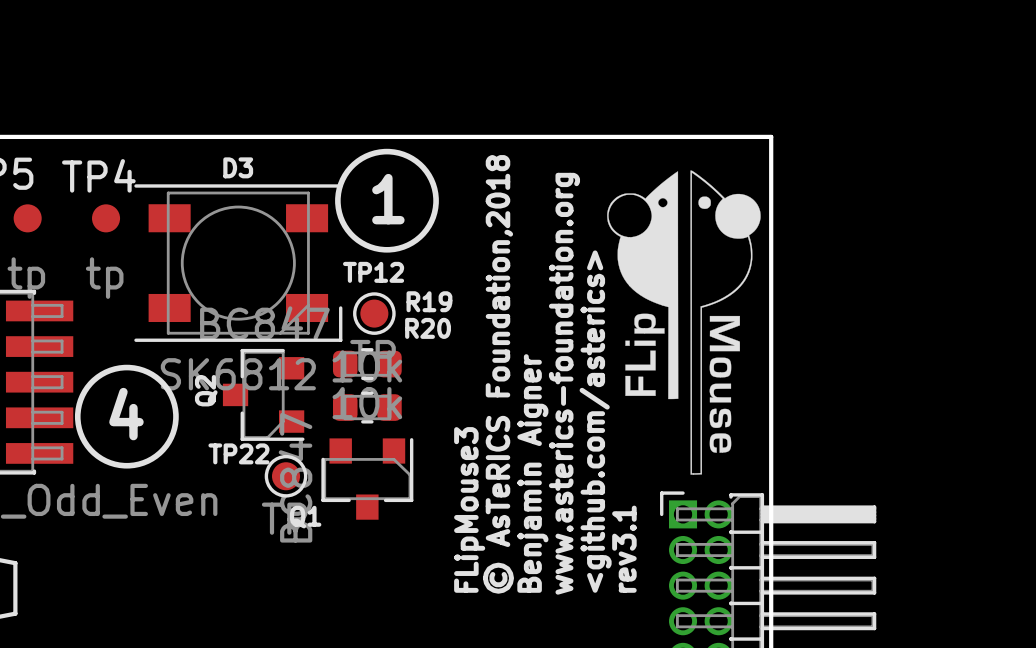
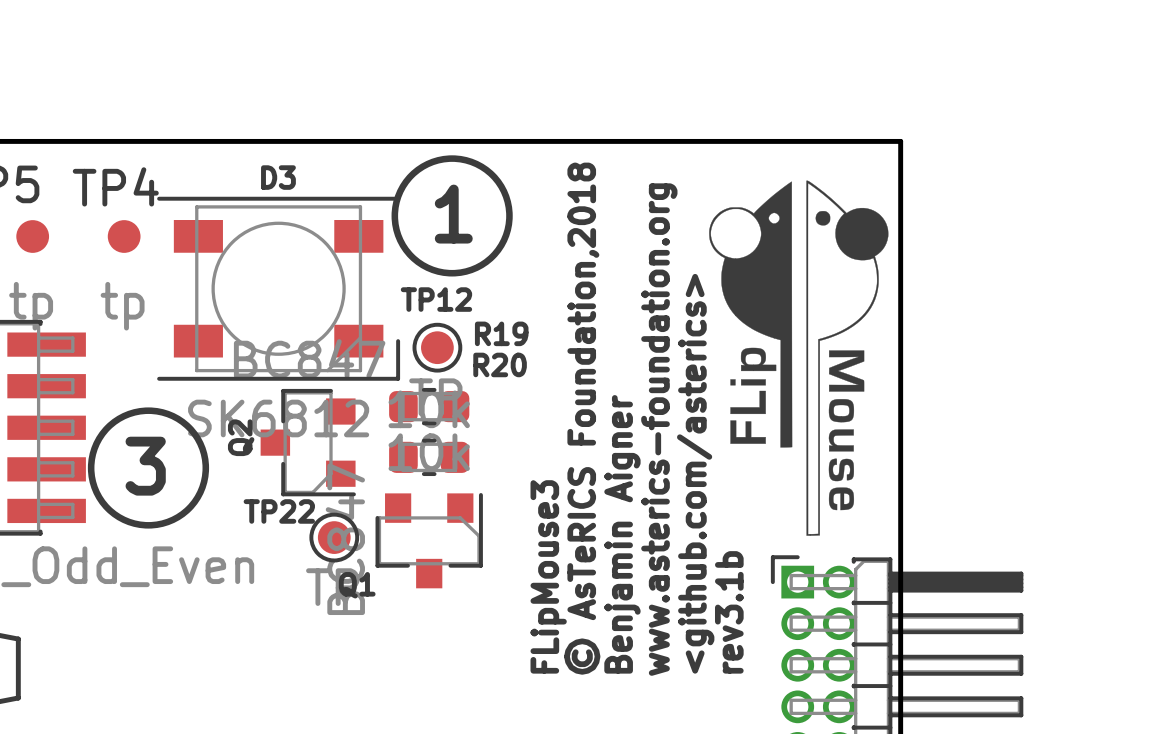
text: 4 (126, 414) -> 3 (145, 466)
text: rev3.1 (624, 549) -> rev3.1b (729, 612)

